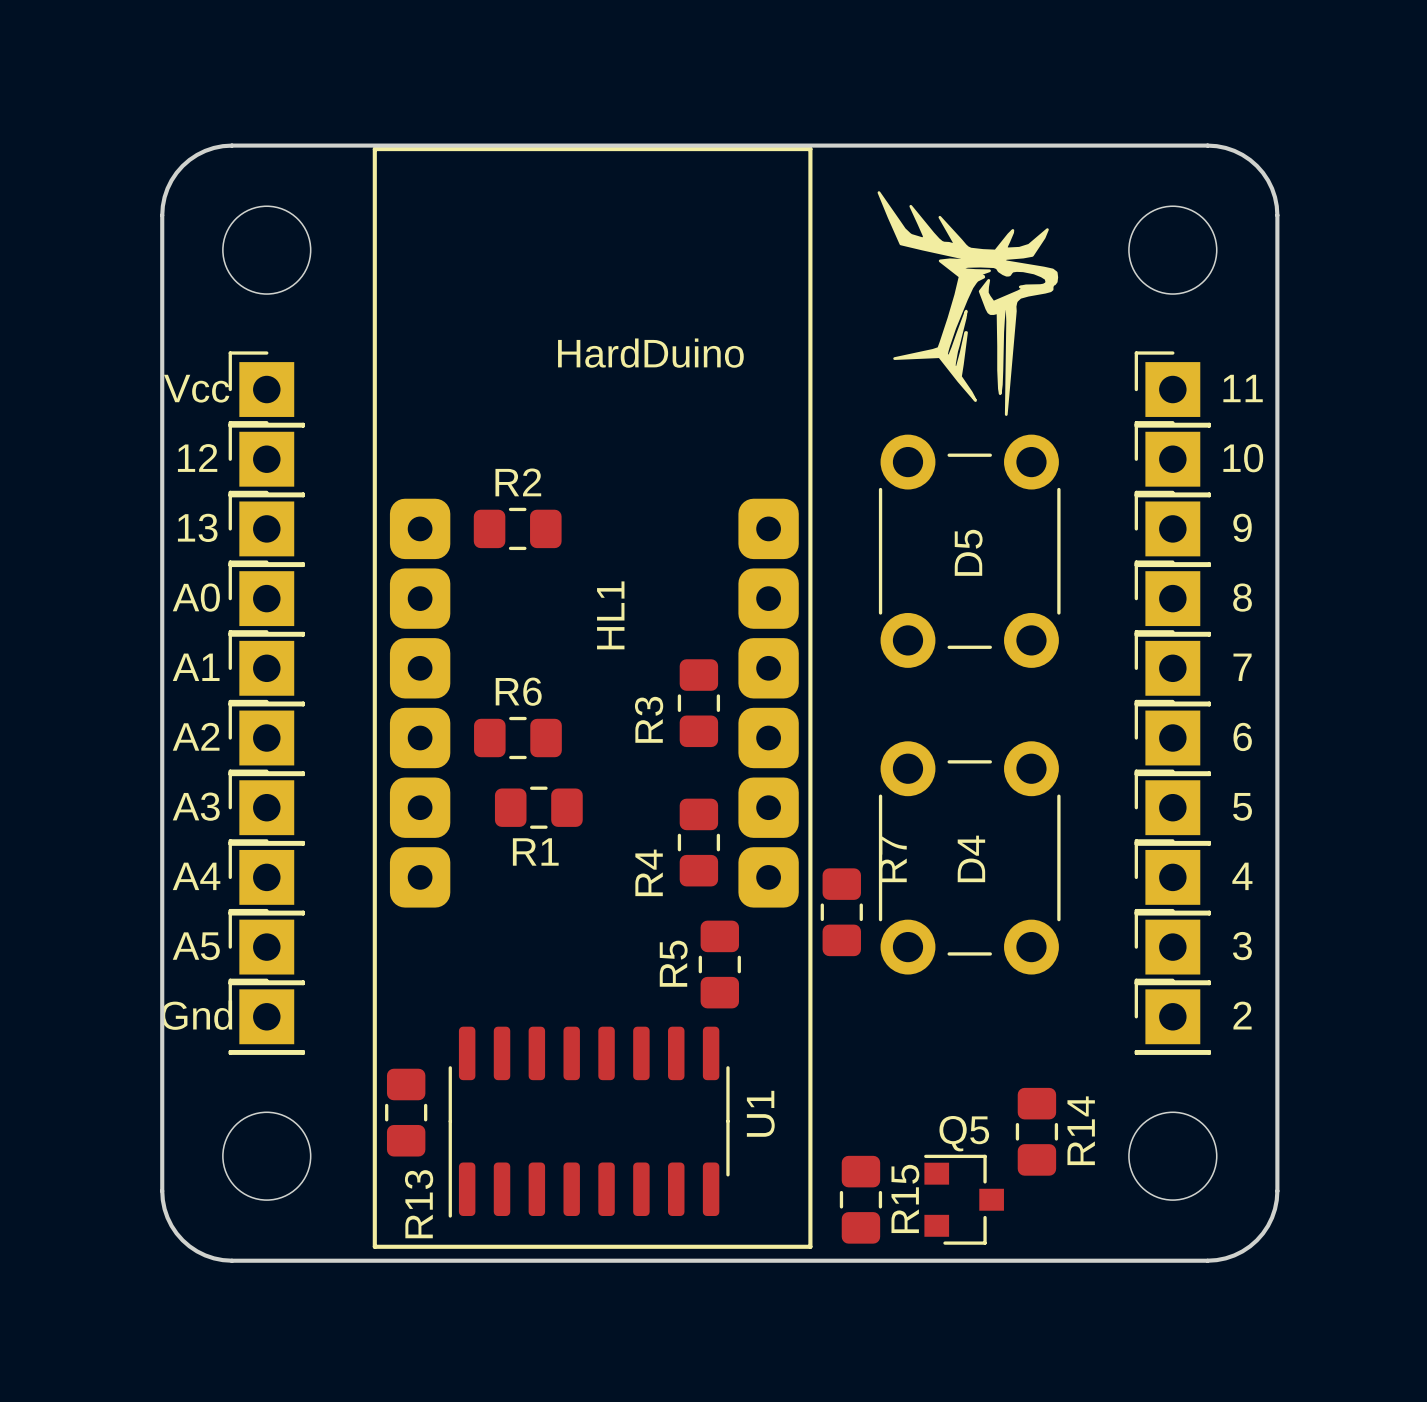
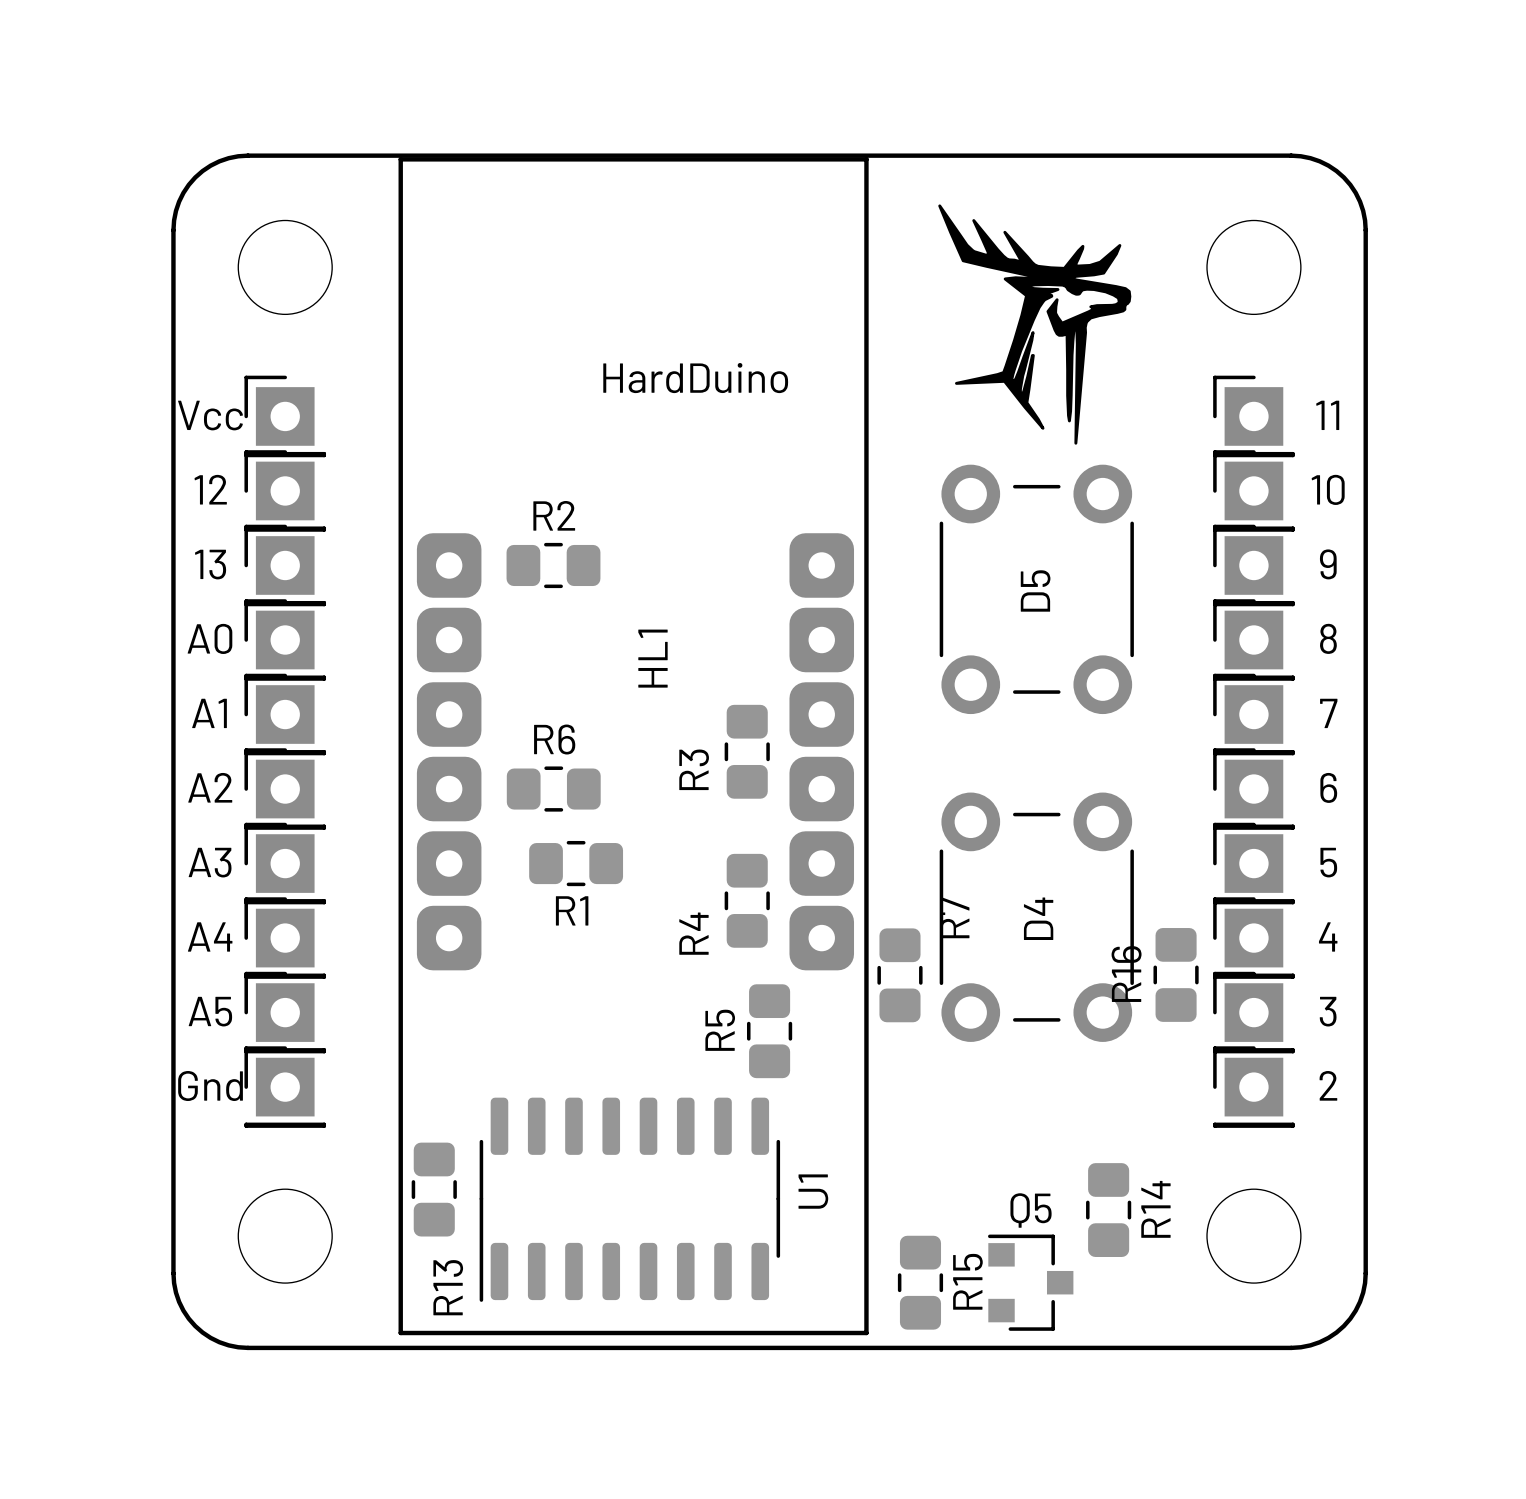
R16: none -> (1176, 974)

